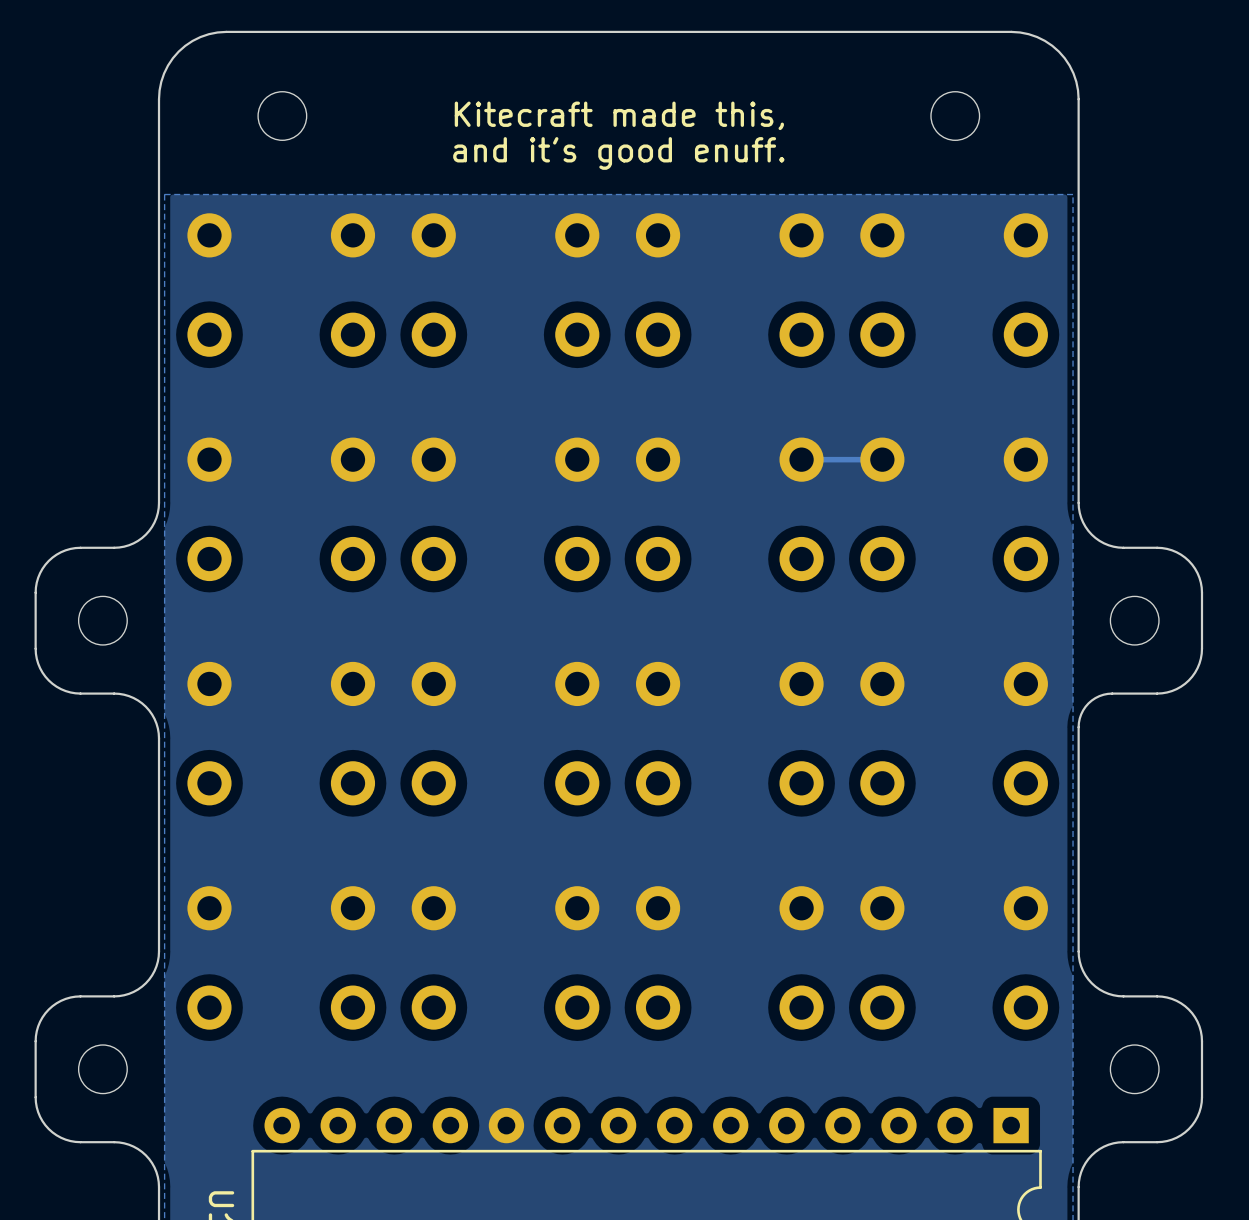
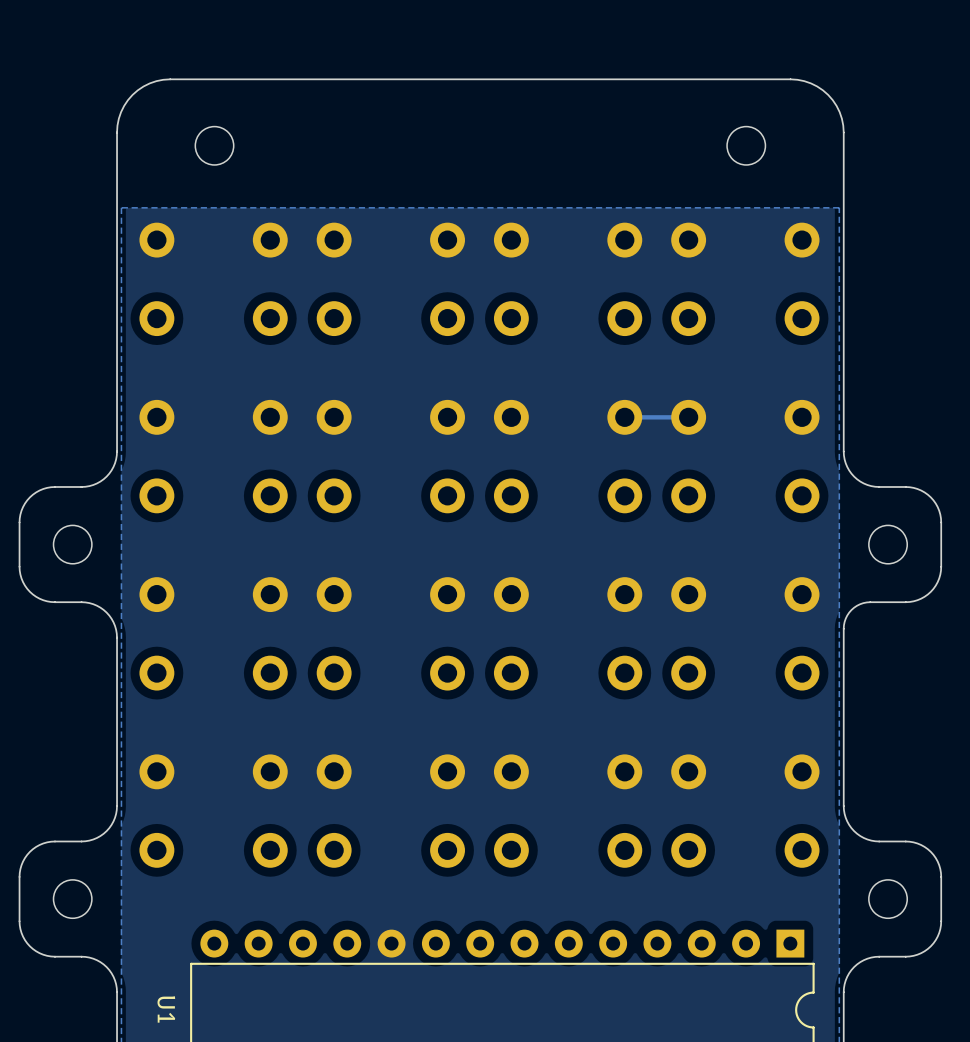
text: Kitecraft made this, (619, 115) -> none
text: and it's good enuff. (618, 153) -> none

